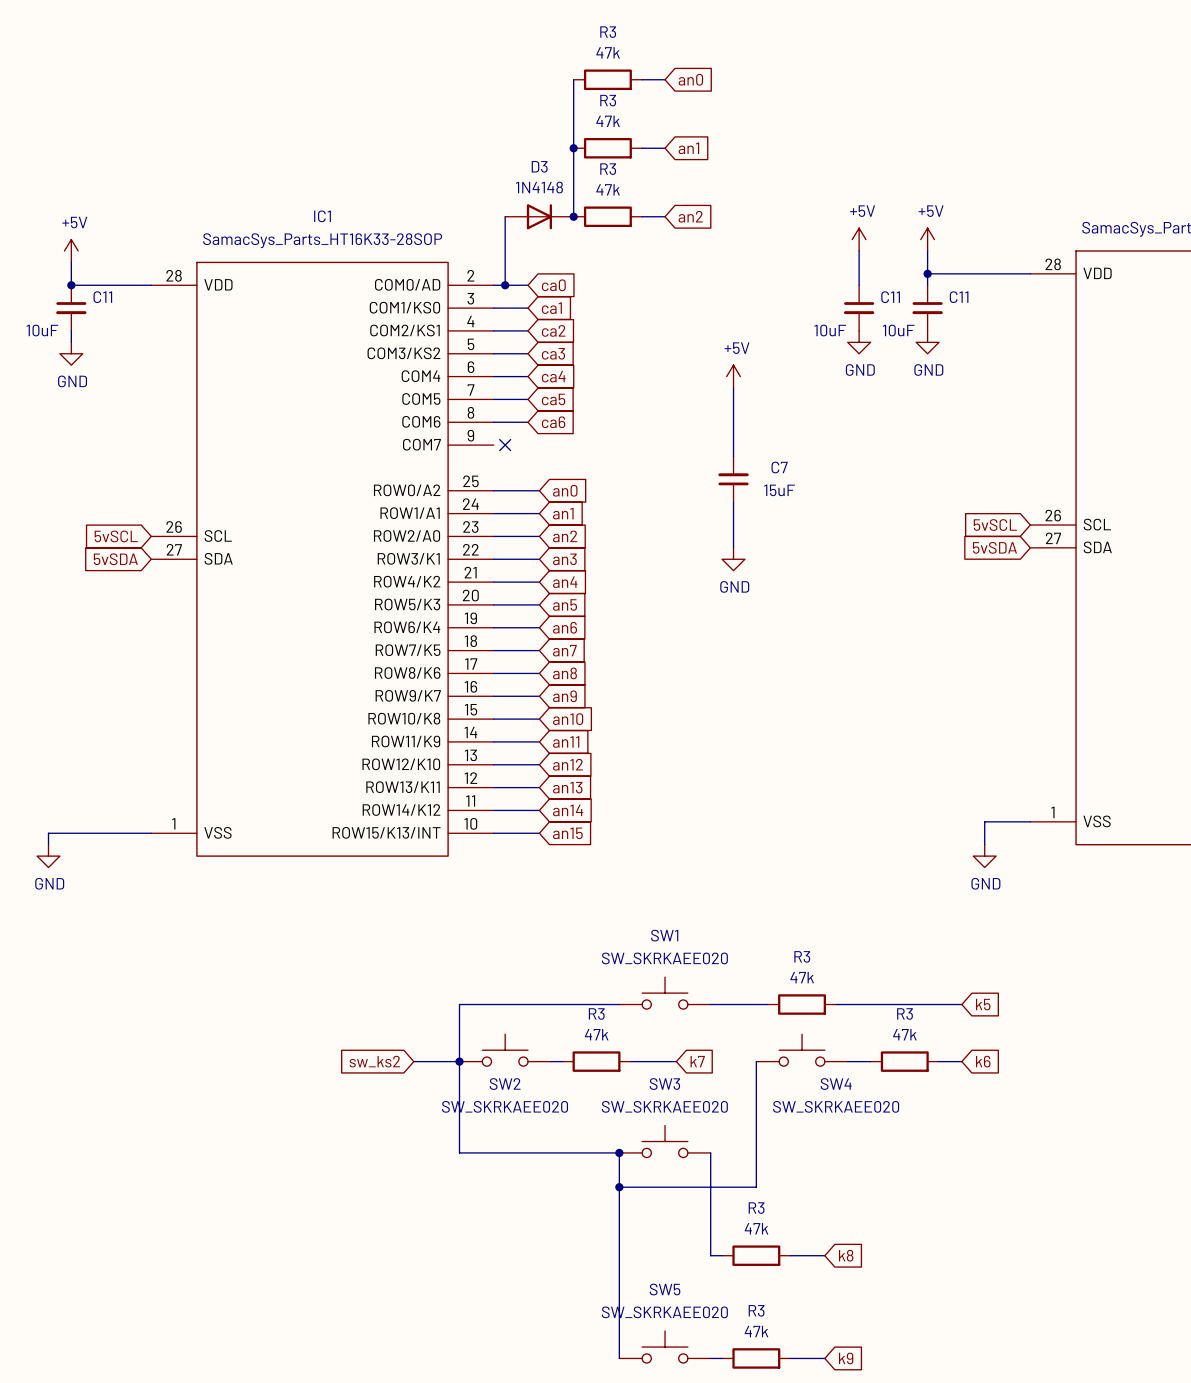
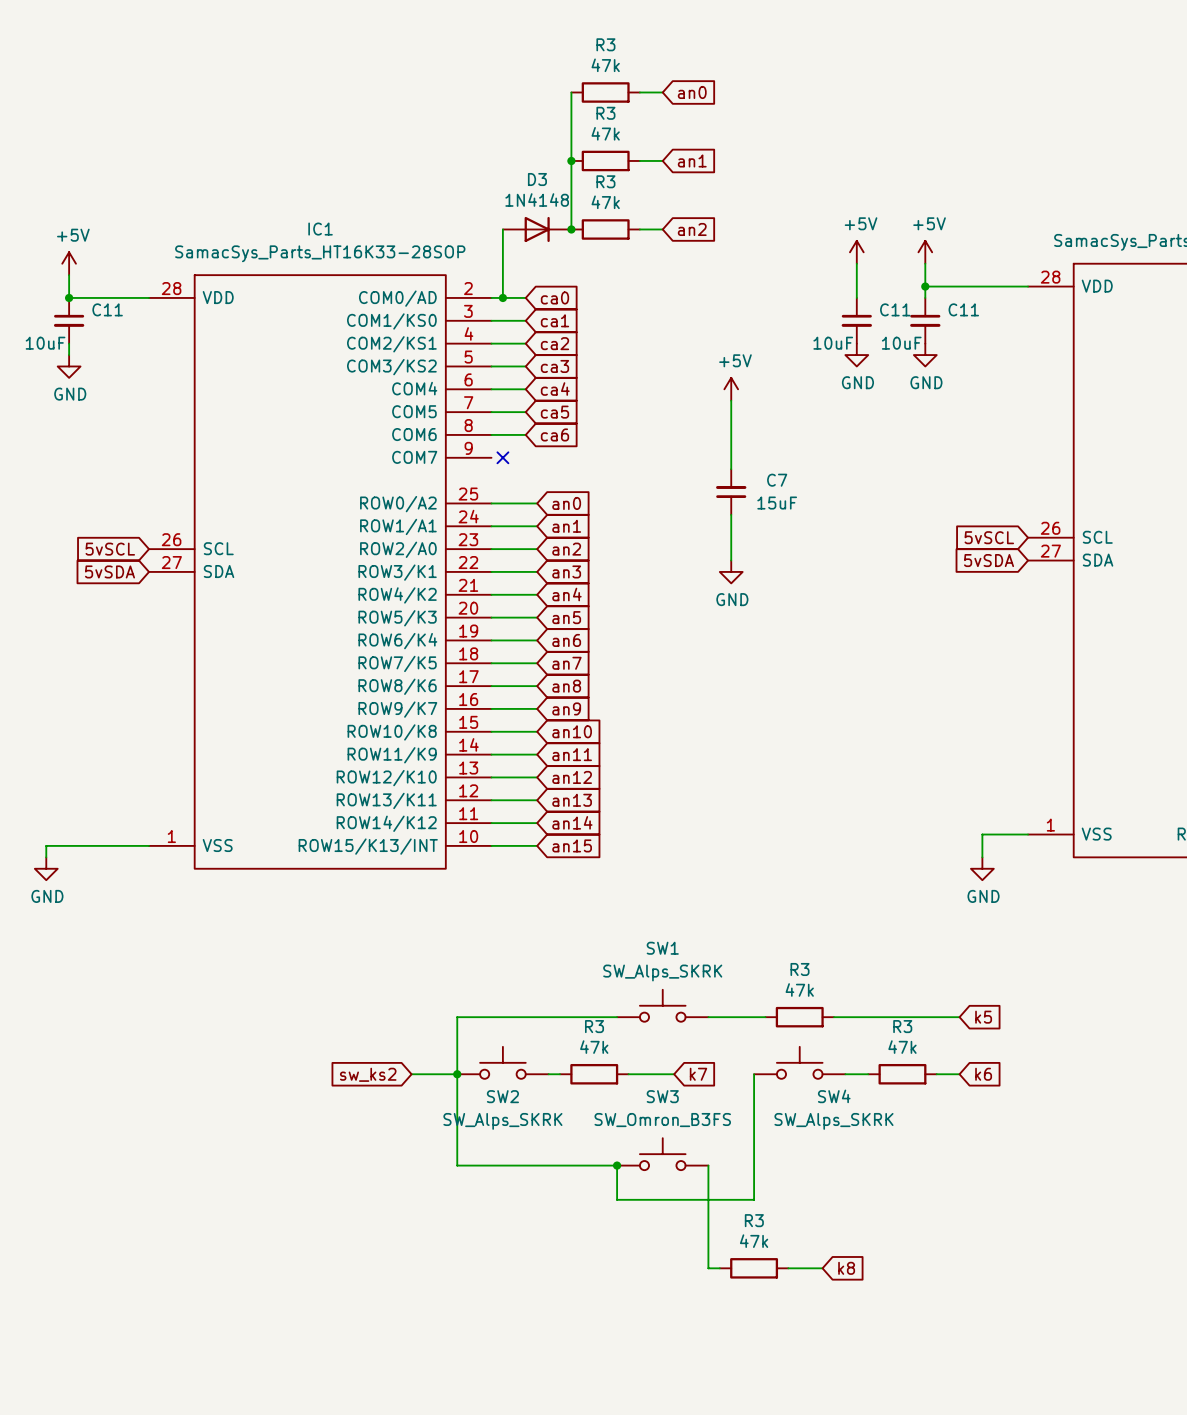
SW1 value: SW_SKRKAEE020 (664, 958) -> SW_Alps_SKRK (662, 972)
SW2 value: SW_SKRKAEE020 (505, 1106) -> SW_Alps_SKRK (502, 1121)
SW3 value: SW_SKRKAEE020 (664, 1106) -> SW_Omron_B3FS (662, 1120)
SW4 value: SW_SKRKAEE020 (836, 1106) -> SW_Alps_SKRK (833, 1121)
wire: (619, 1187) (619, 1358) -> none
junction: (619, 1187) -> none
SW5: SW_SKRKAEE020 (665, 1347) -> none
wire: (710, 1358) (722, 1358) -> none
R3: 47k (756, 1358) -> none
wire: (790, 1358) (824, 1358) -> none
global label: k9 (846, 1358) -> none

